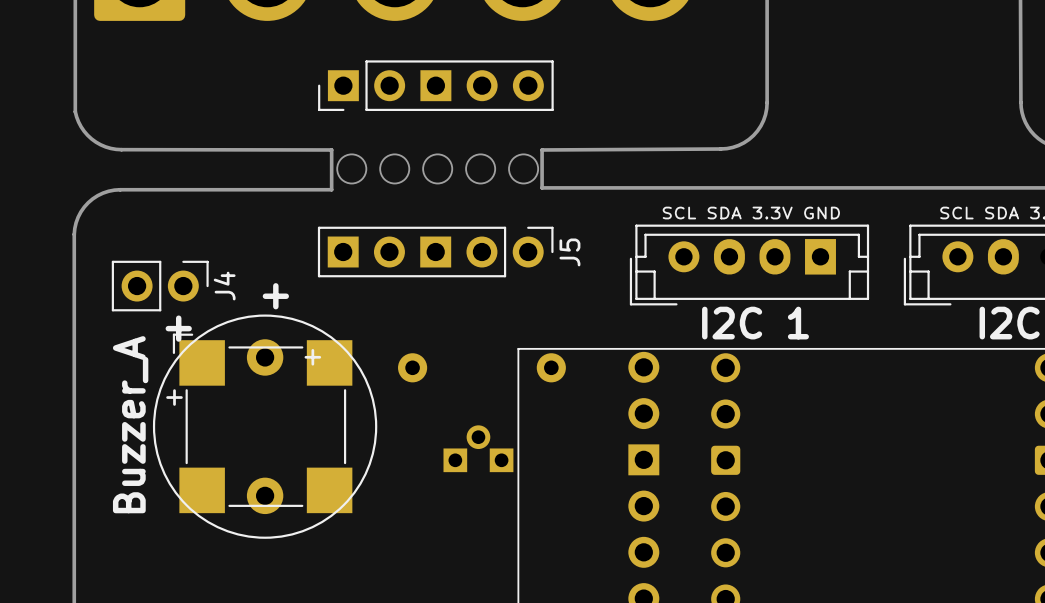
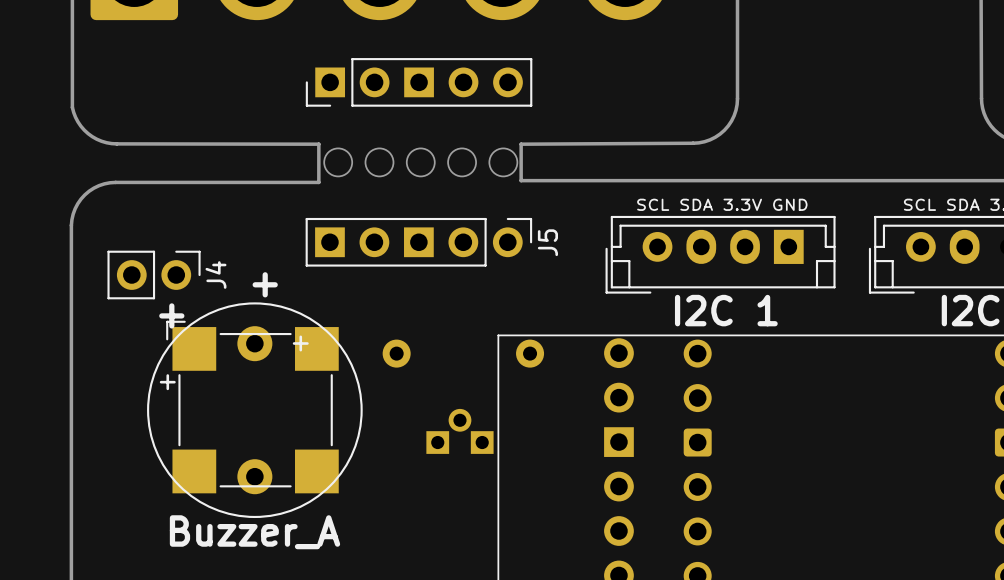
part value rotation: 0° (130, 424) -> 90° clockwise (254, 532)

